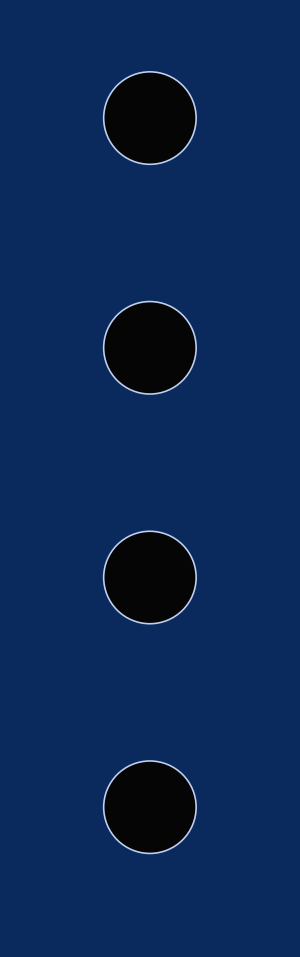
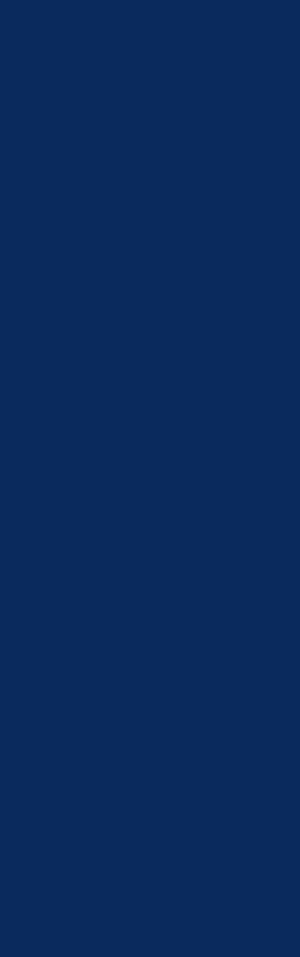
part: (149, 118) -> none
part: (149, 347) -> none
part: (149, 577) -> none
part: (149, 807) -> none

